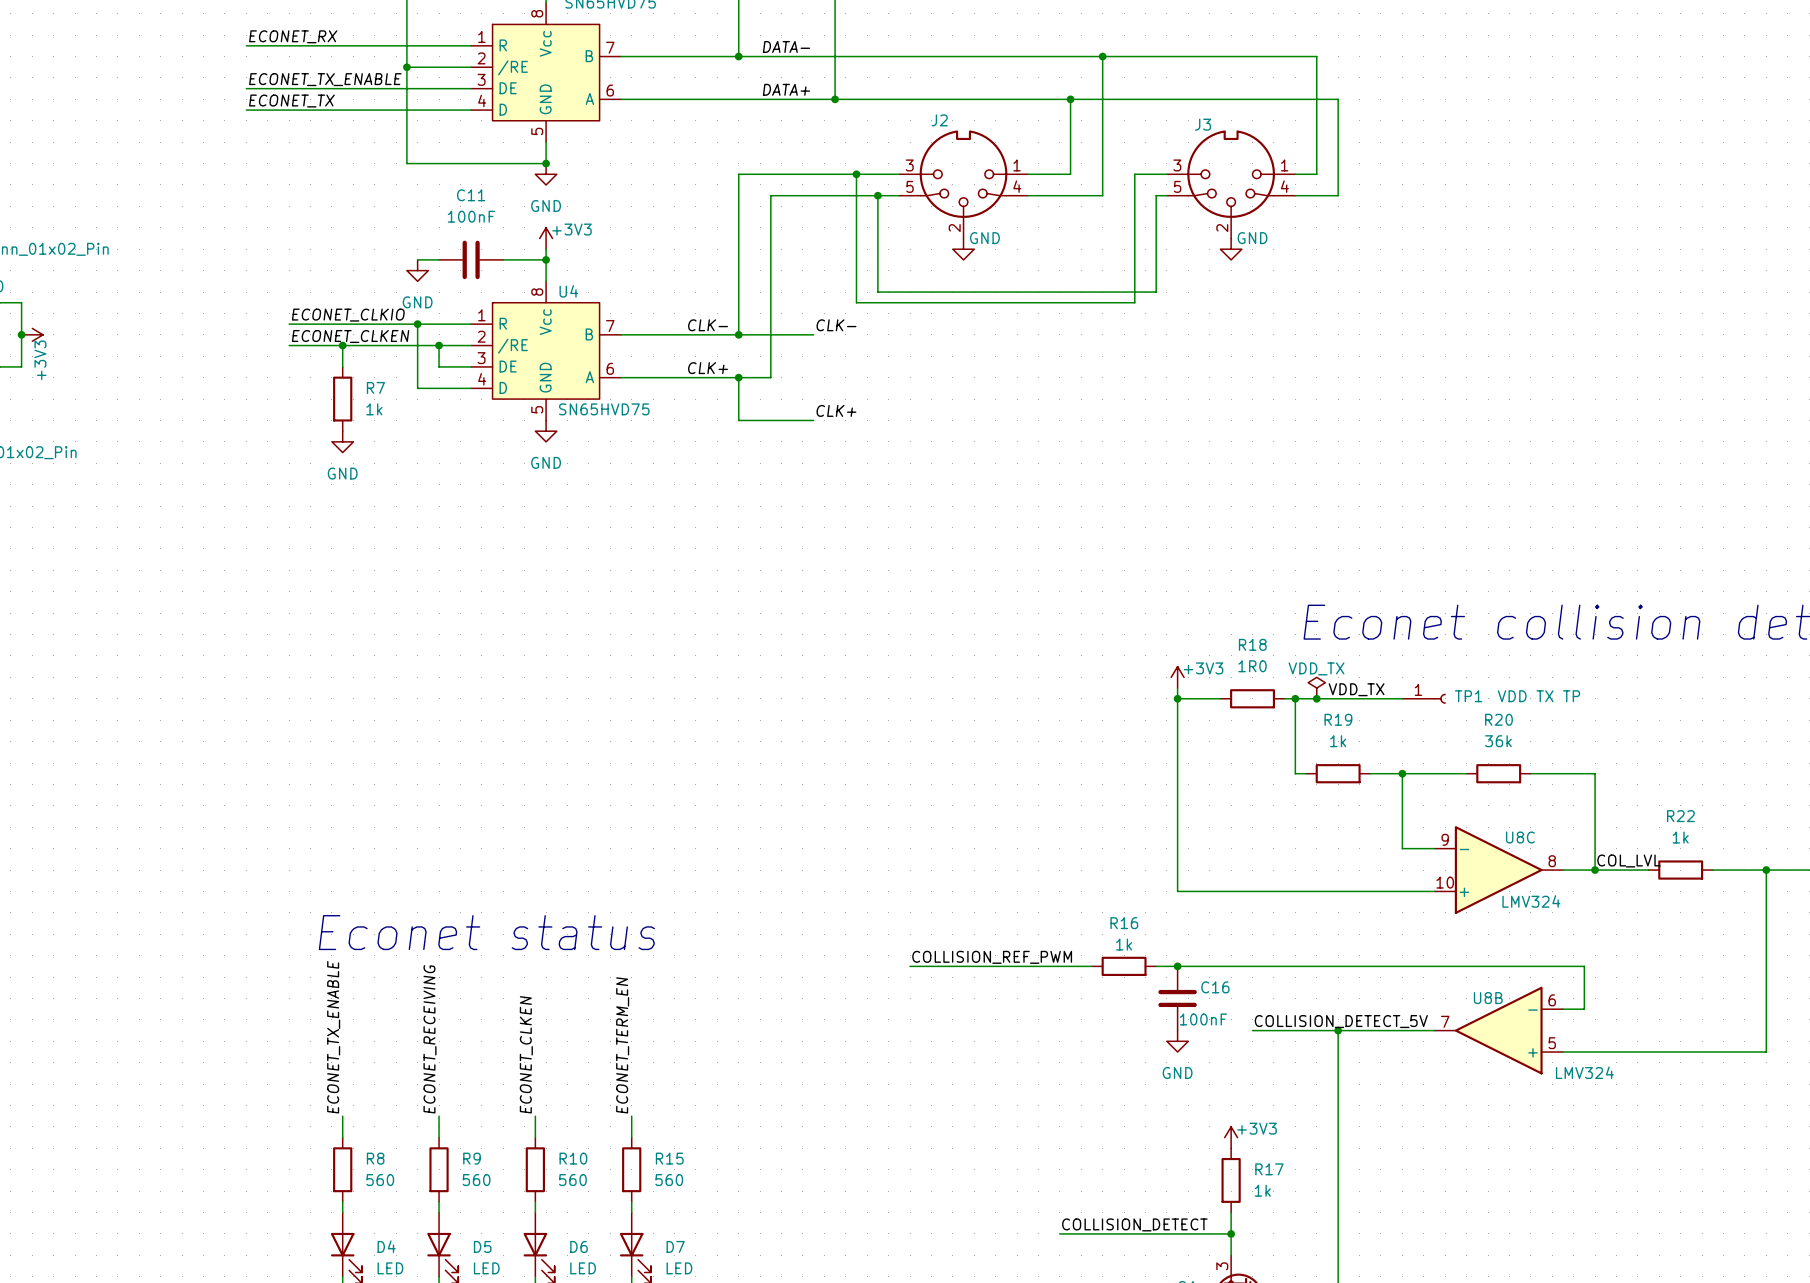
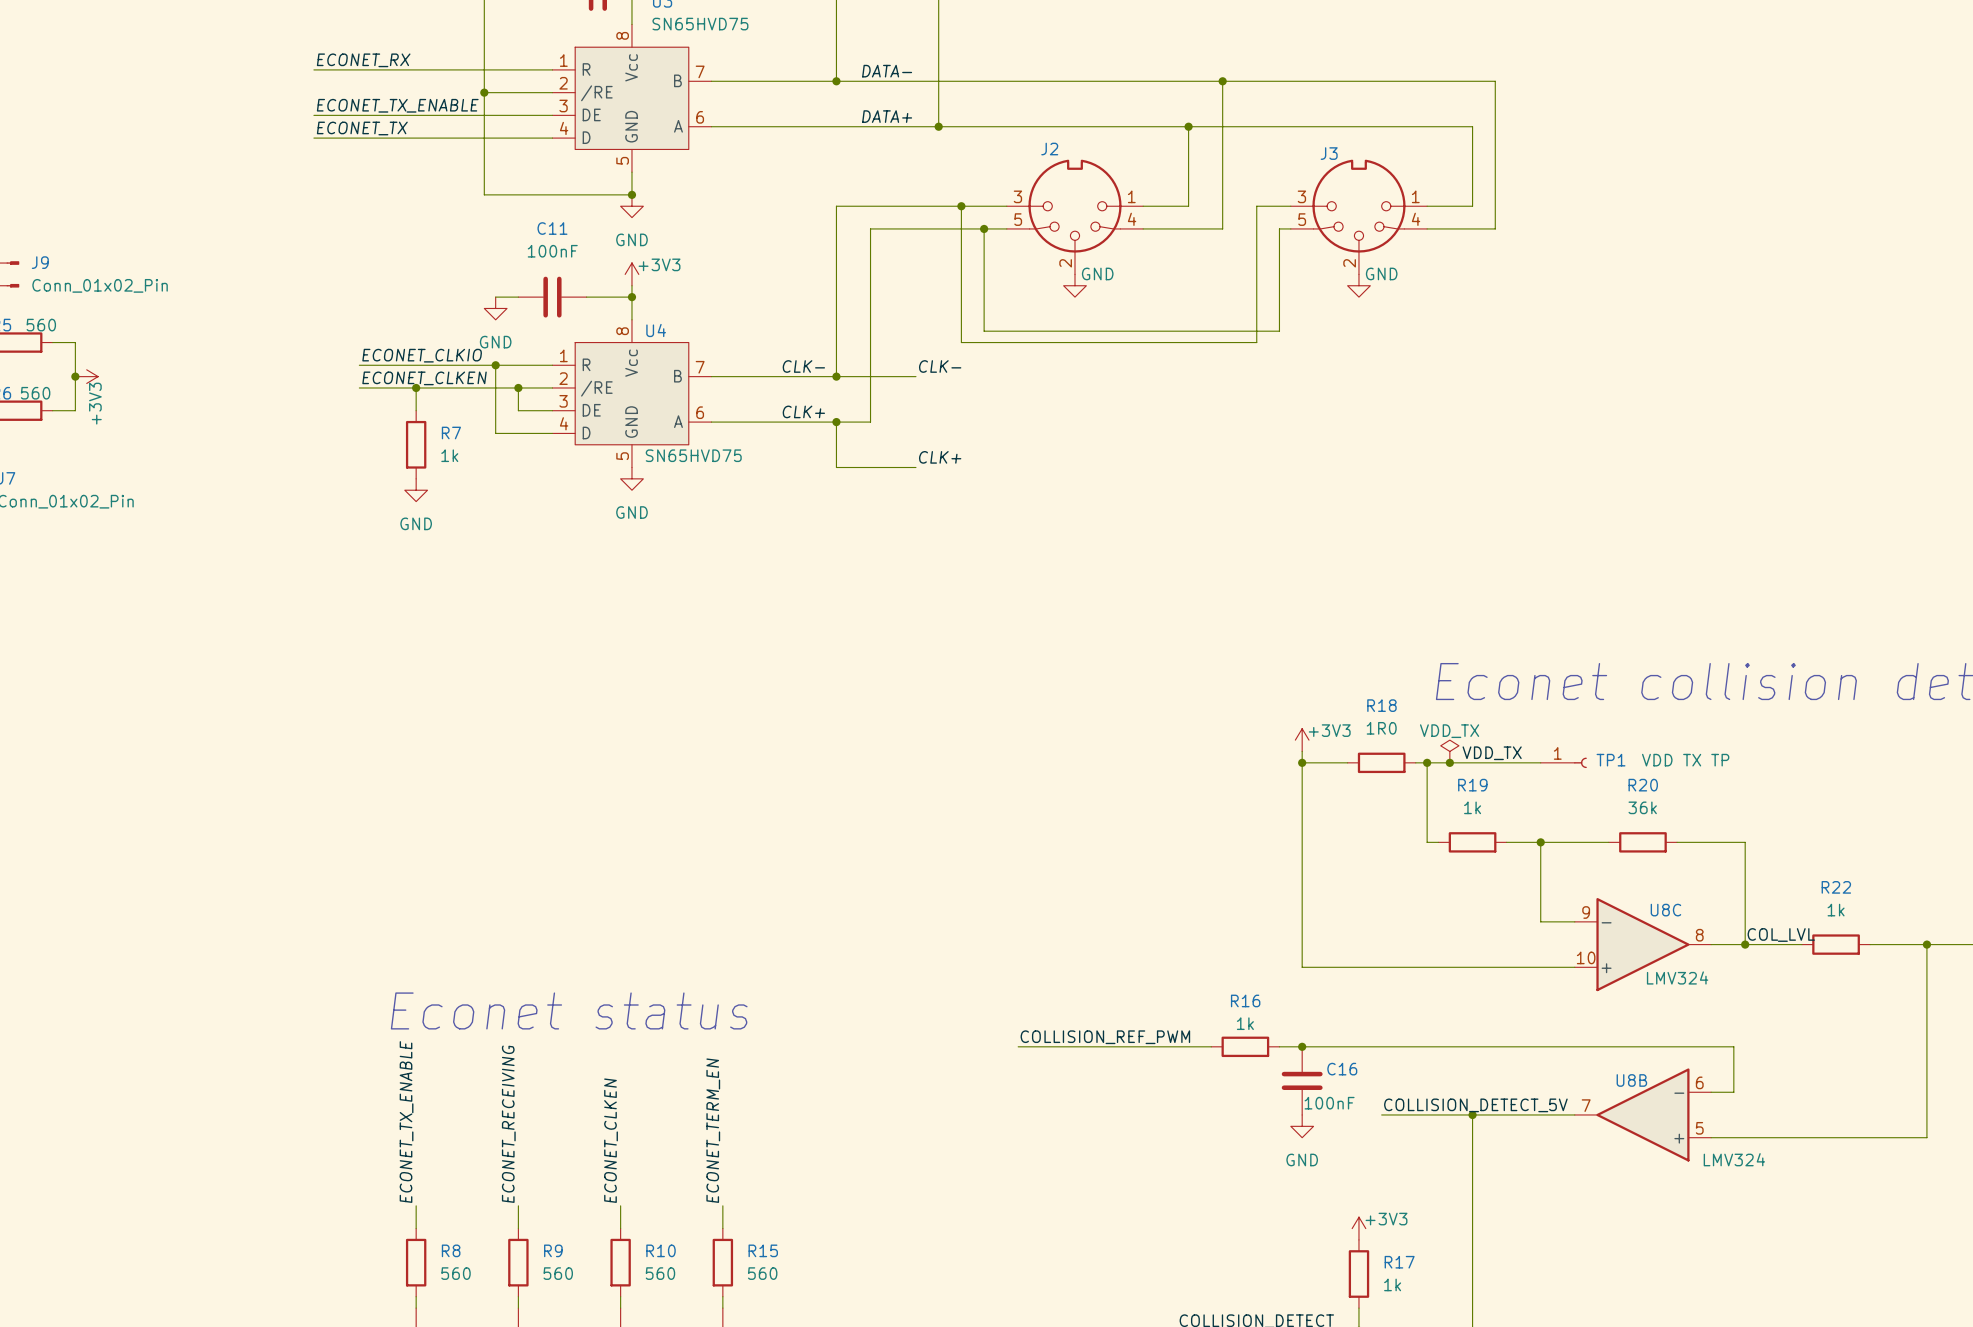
wire: (1316, 56) (1316, 174) -> (1449, 81) (1495, 81) (1495, 228) (1472, 228)
wire: (1338, 174) (1338, 195) -> (1472, 206) (1449, 206)

